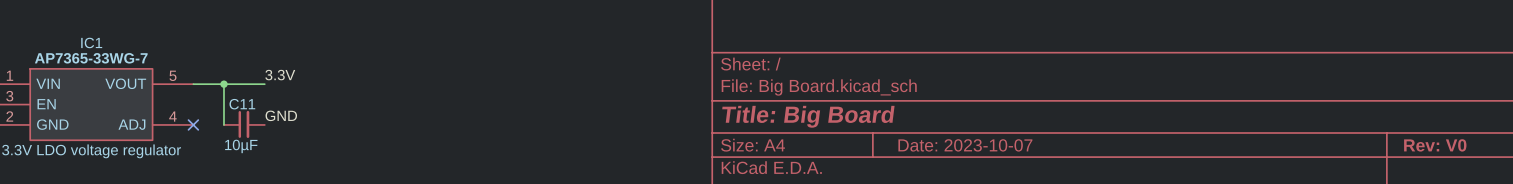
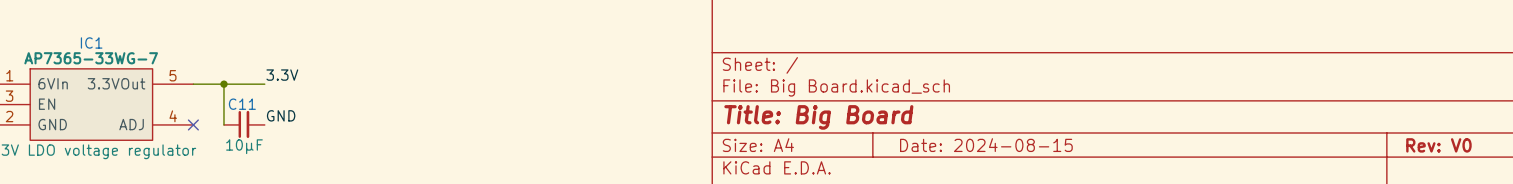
IC1 pin name: VIN (48, 83) -> 6VIn (53, 83)
IC1 pin name: VOUT (125, 83) -> 3.3VOut (116, 83)
title block: Date: 2023-10-07 (965, 145) -> Date: 2024-08-15 (986, 145)

